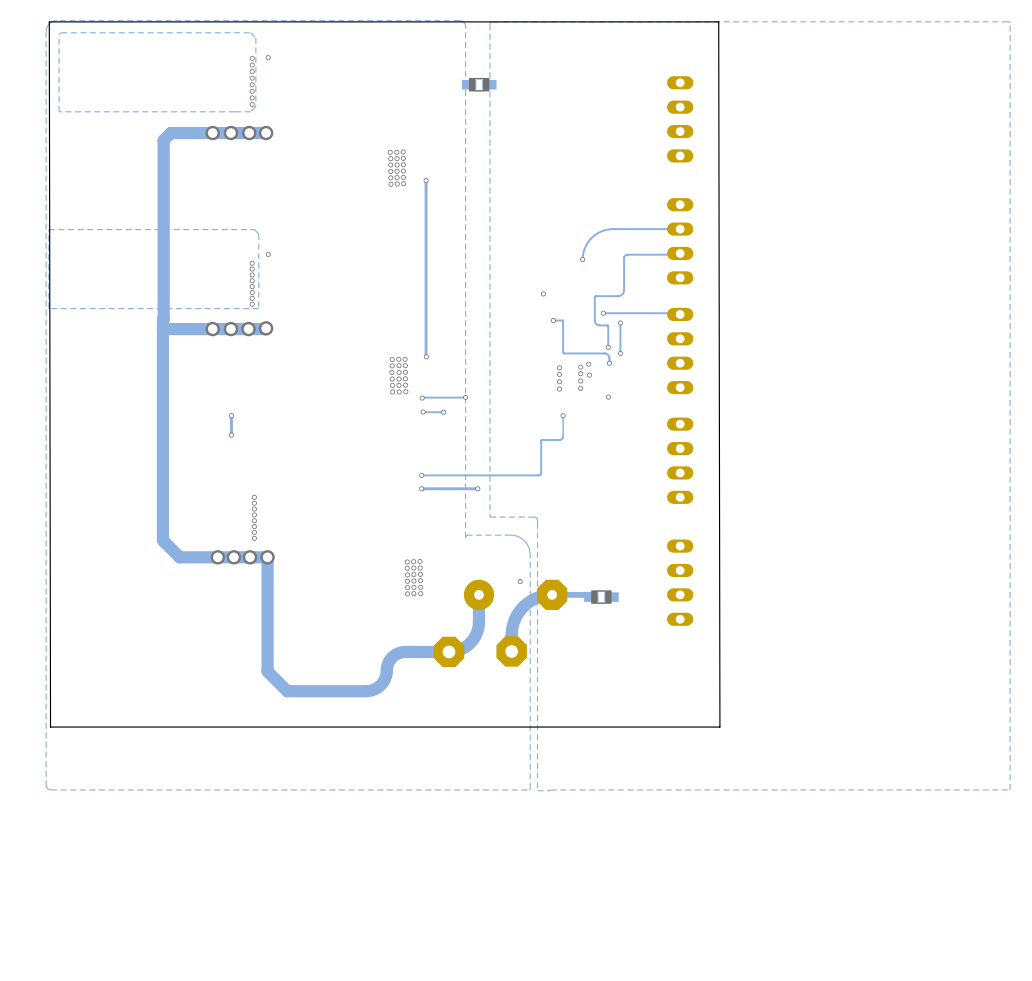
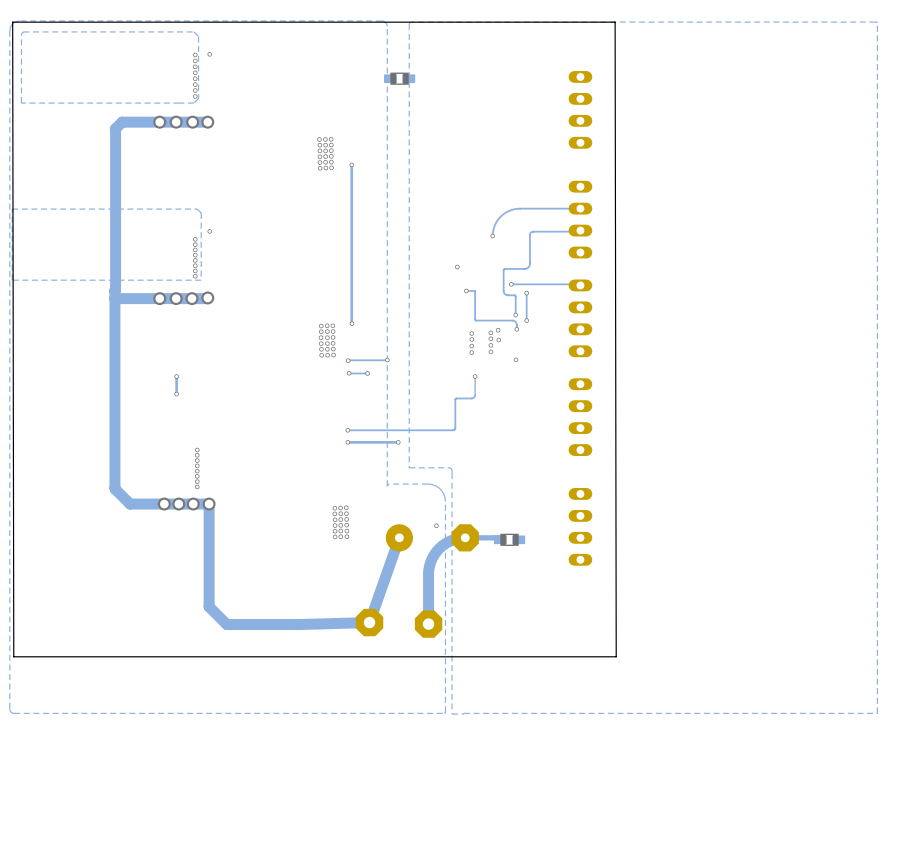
track: (478, 594) (477, 629) (472, 640) (467, 645) (452, 651) (398, 653) (389, 661) (382, 683) (376, 688) (366, 691) -> (399, 537) (369, 622) (297, 624)
track: (552, 594) (534, 598) (520, 610) (512, 626) (511, 651) -> (465, 537) (445, 543) (432, 558) (428, 574) (428, 624)
part: (449, 651) -> none
part: (511, 651) -> none
part: none -> (369, 622)
part: none -> (428, 624)

